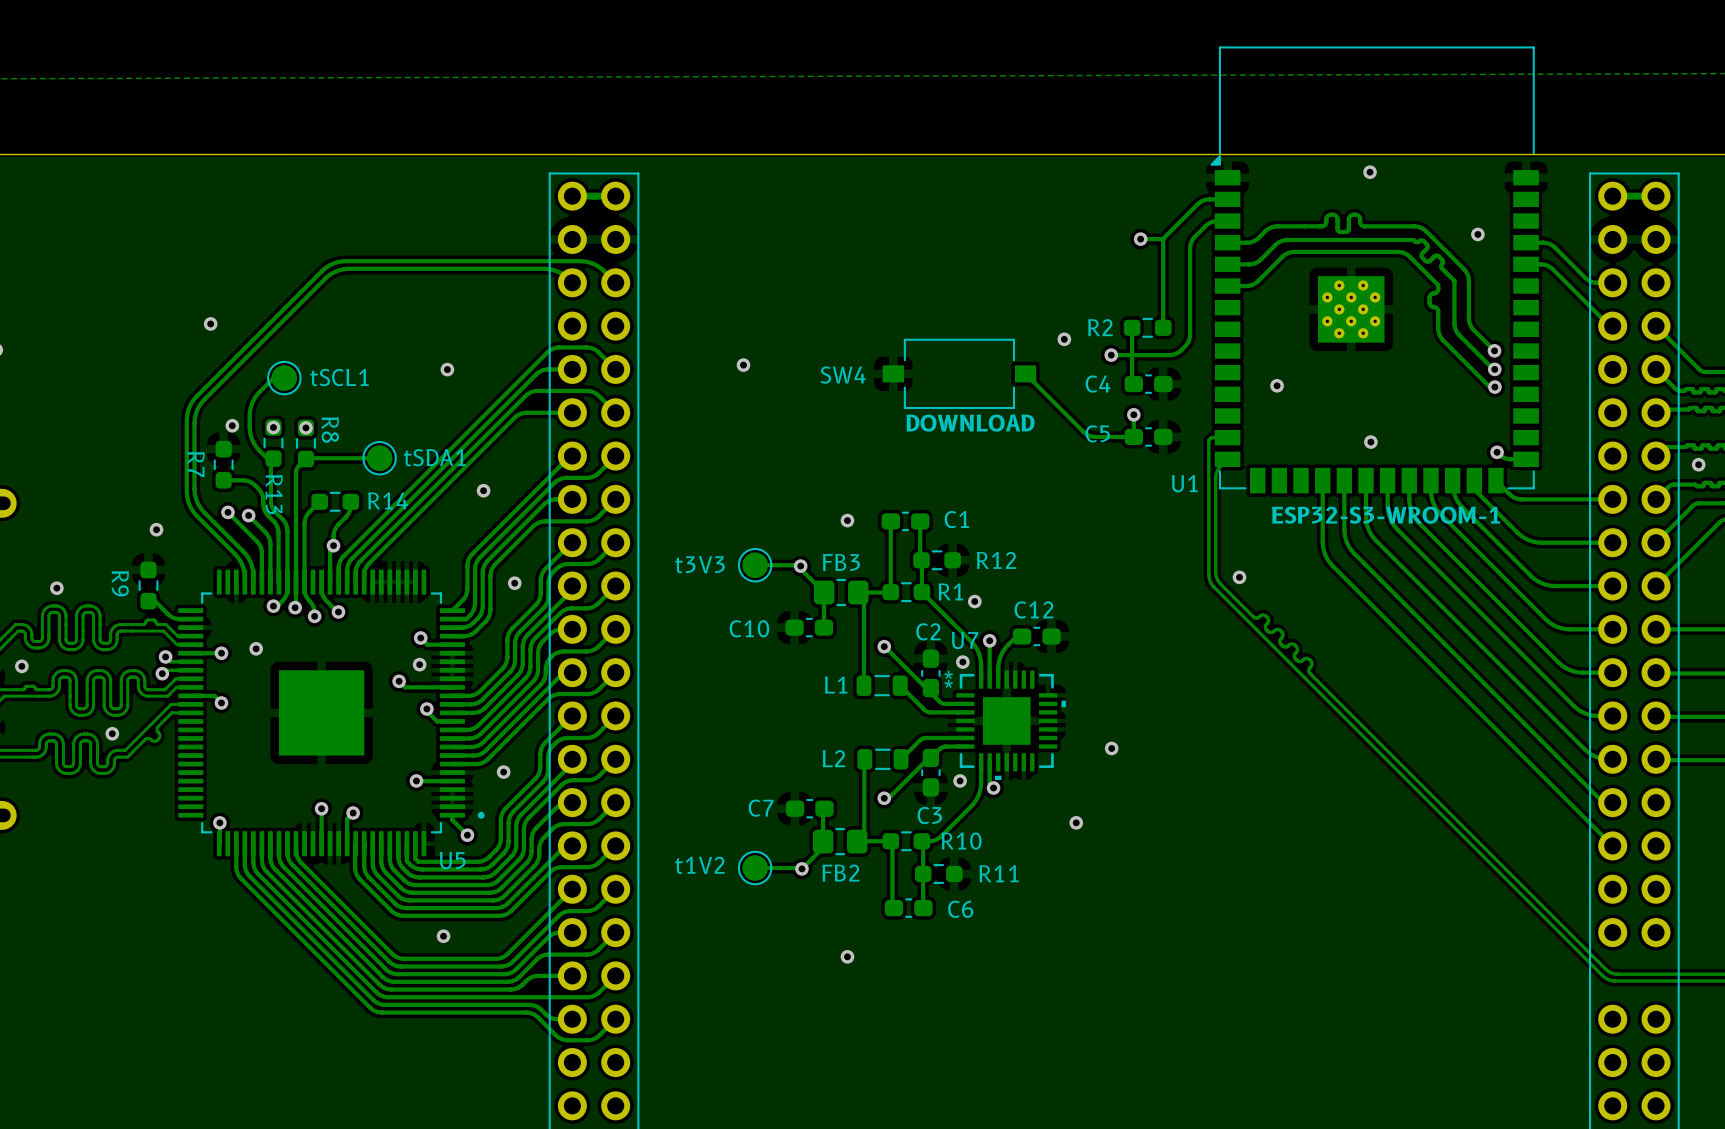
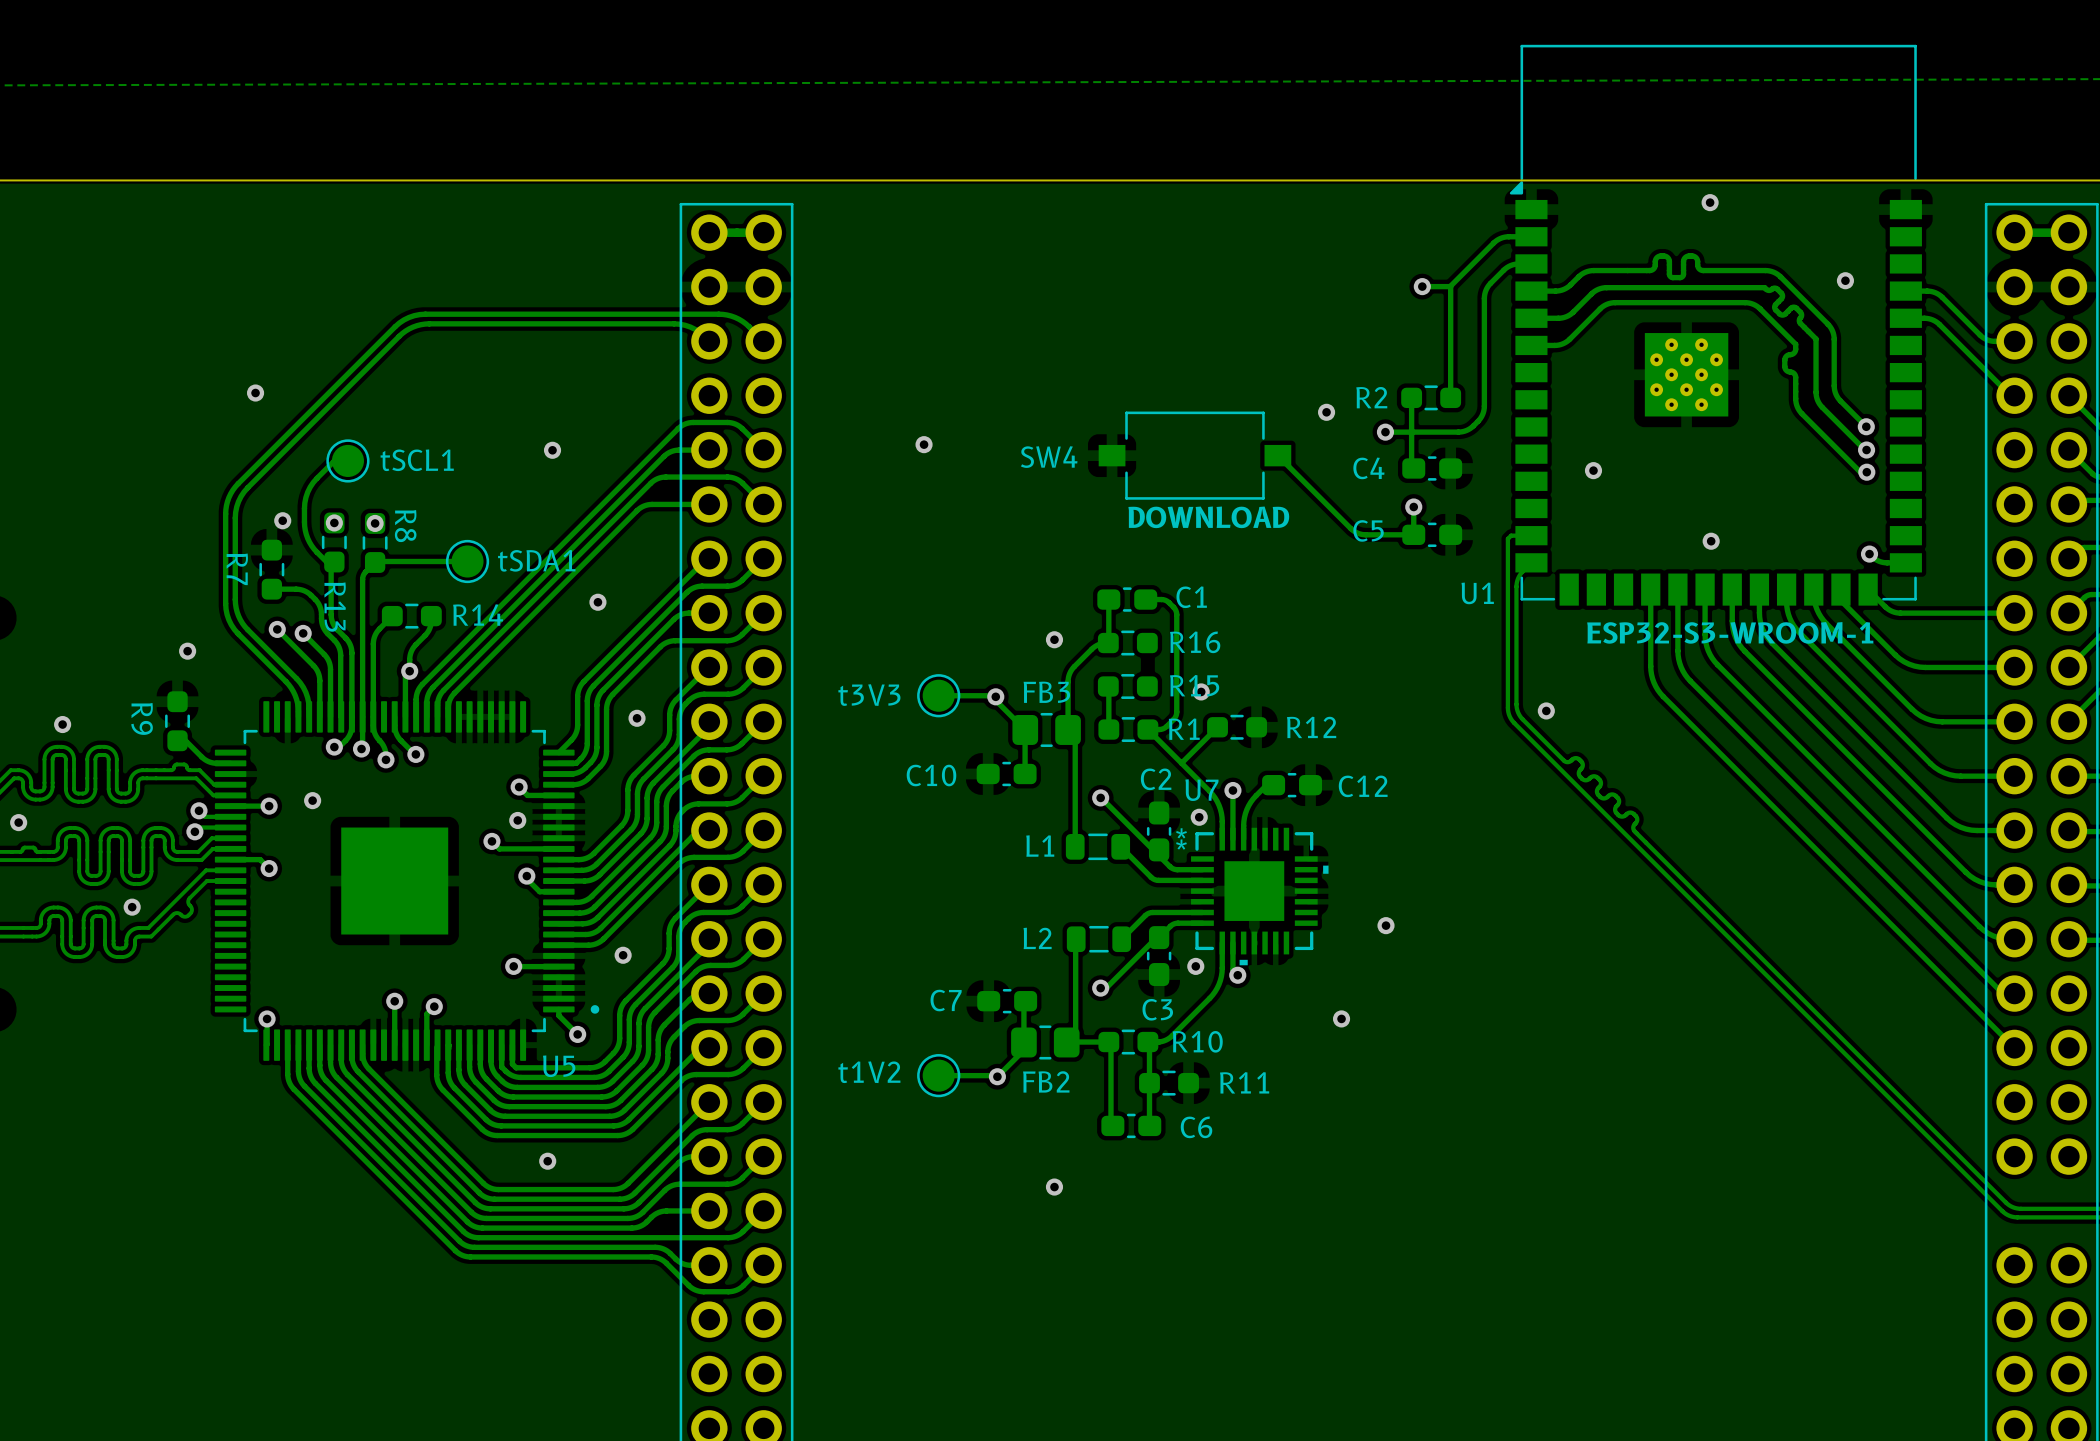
C1 position: (905, 521) -> (1127, 599)
track: (920, 521) (921, 592) -> (1145, 599) (1166, 600) (1174, 608) (1176, 614) (1176, 714) (1164, 728) (1147, 729)
R16: none -> (1127, 643)
R15: none -> (1127, 686)
R12 position: (937, 560) -> (1237, 727)
track: none -> (1217, 727) (1181, 763)
track: (890, 592) (858, 592) -> (1108, 642) (1093, 647) (1069, 673) (1068, 729)
via position: (974, 601) -> (1201, 691)
C12 name position: C12 (1034, 609) -> C12 (1363, 786)

